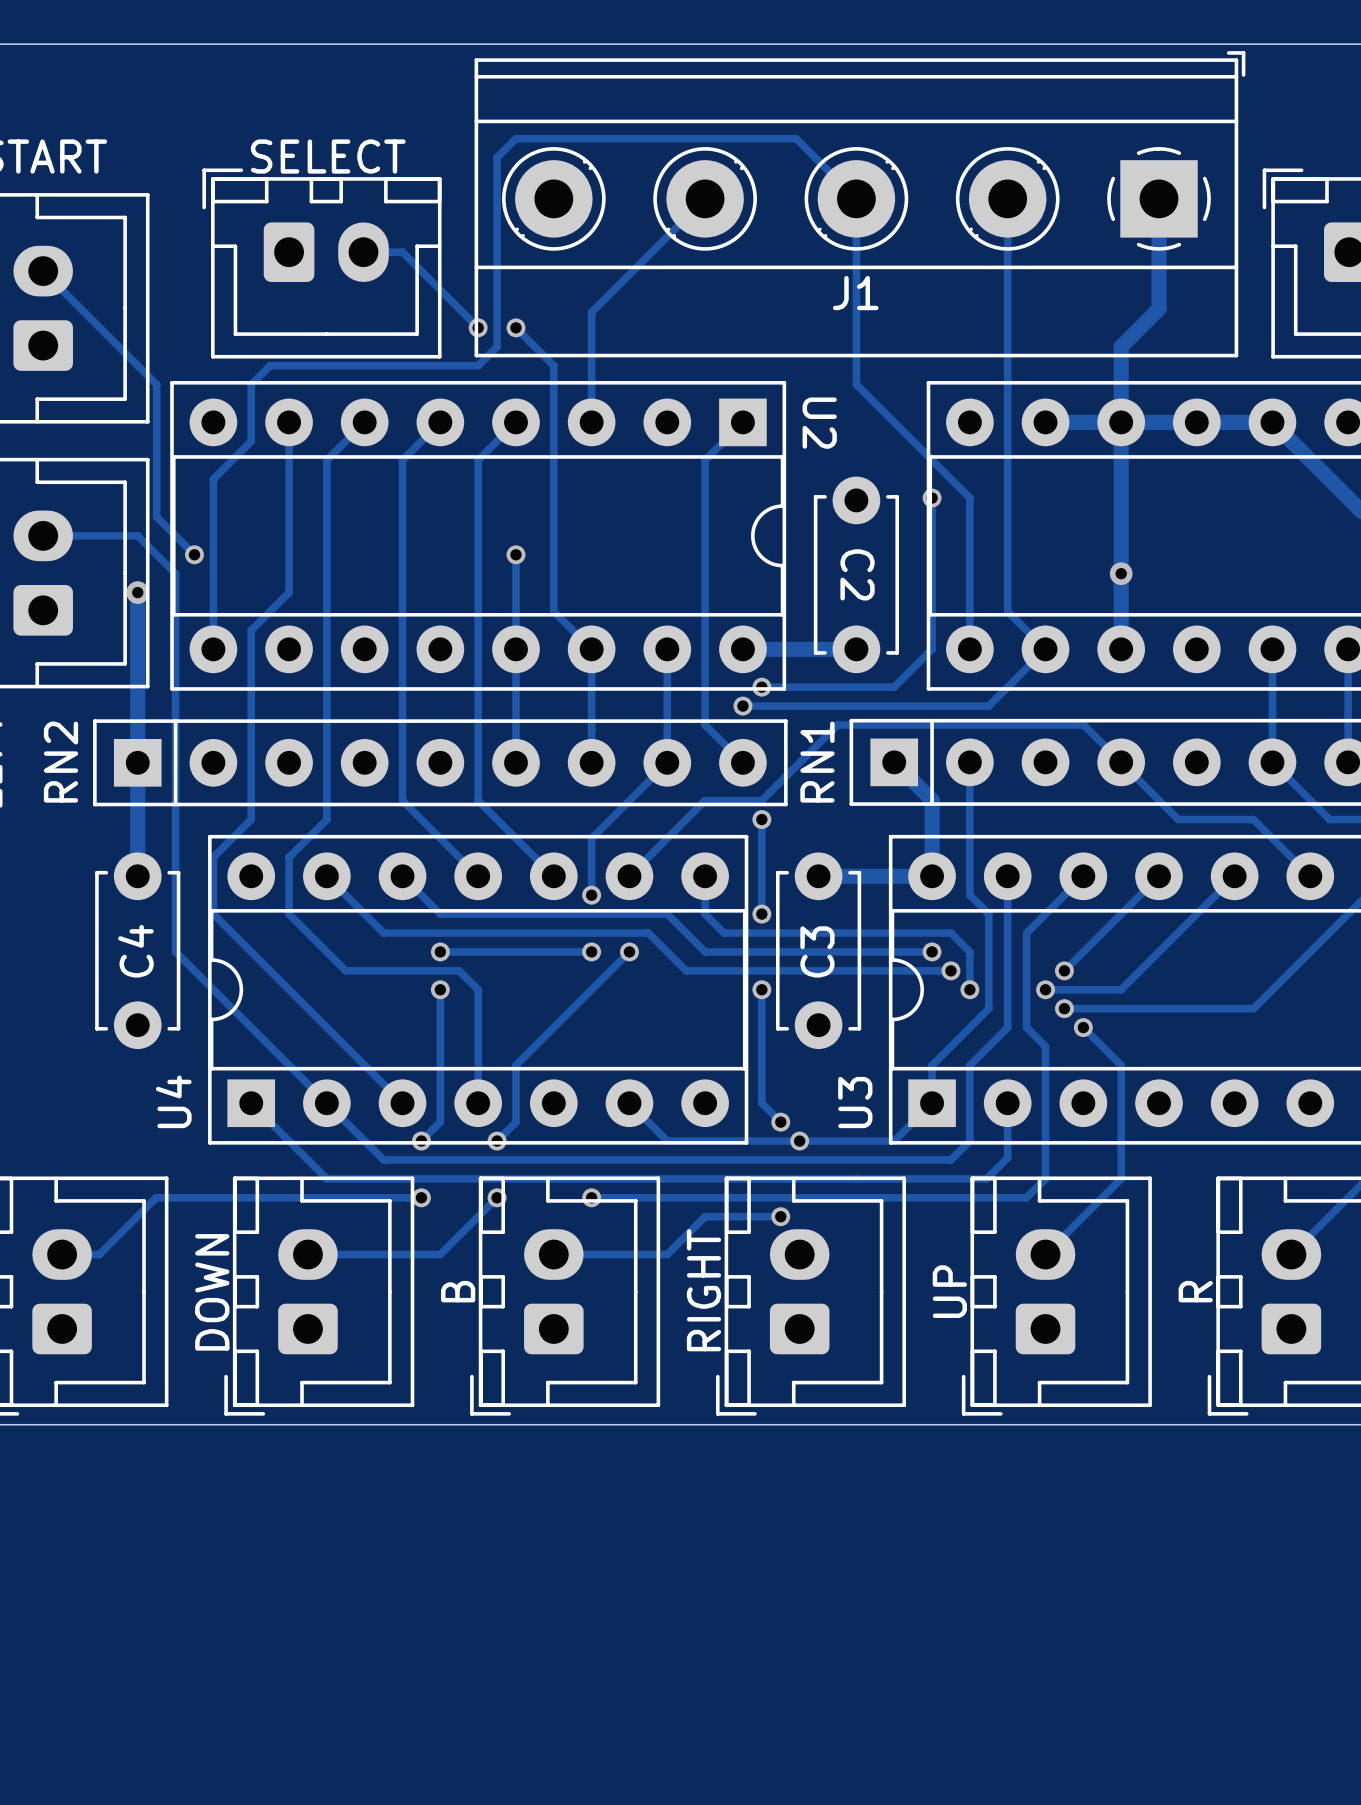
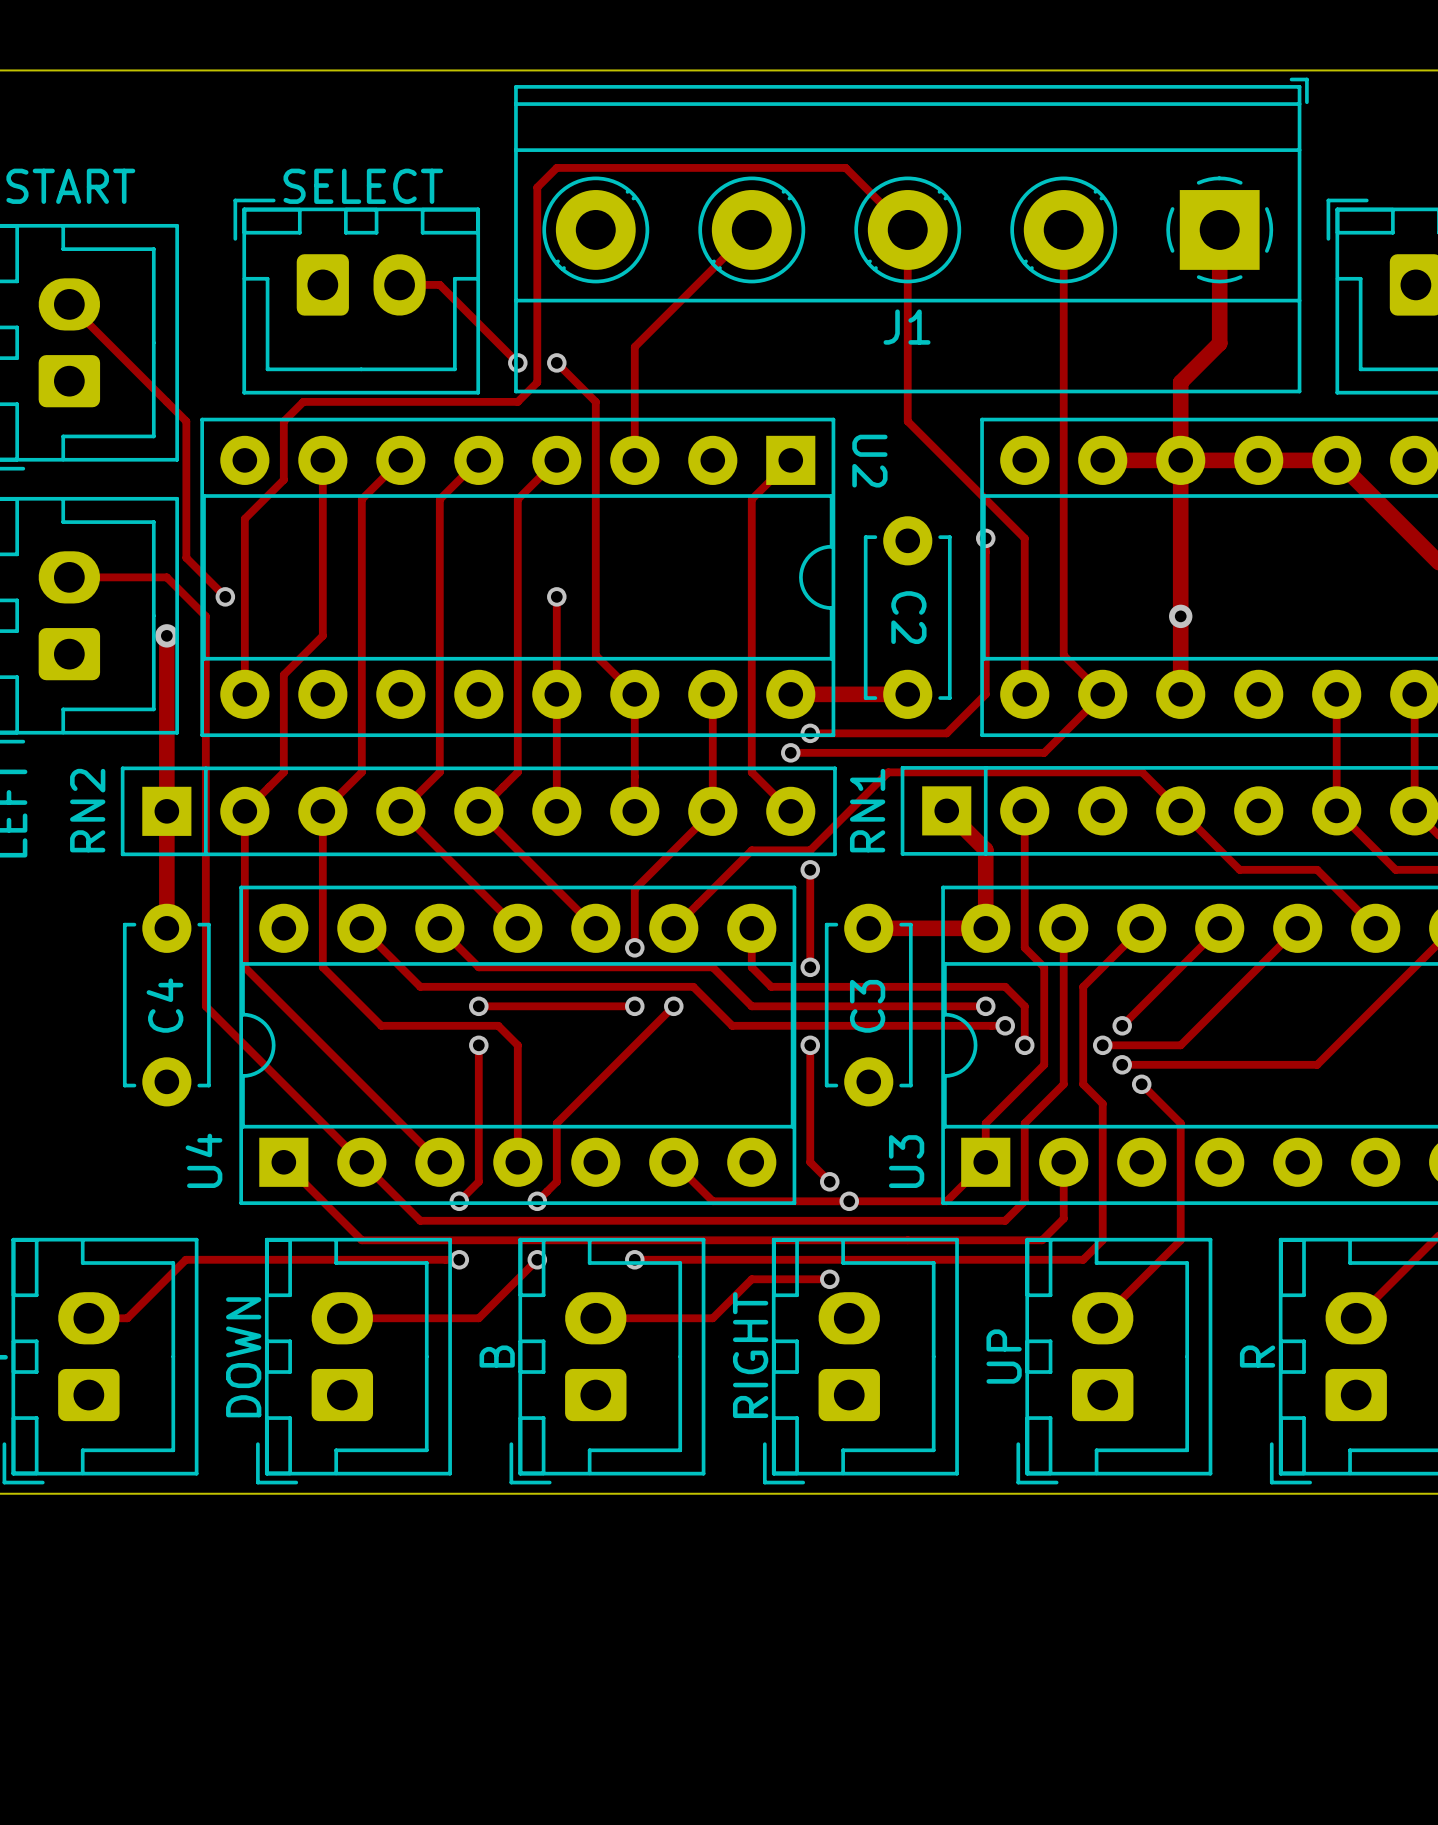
track: (251, 724) (251, 819) (213, 857) -> (283, 772) (244, 811) (244, 908)
track: (326, 724) (326, 819) (289, 857) -> (361, 772) (322, 811) (322, 908)
track: (402, 724) (402, 800) -> (439, 772) (400, 811) (439, 850)
track: (478, 724) (478, 800) -> (517, 772) (478, 811) (517, 850)

